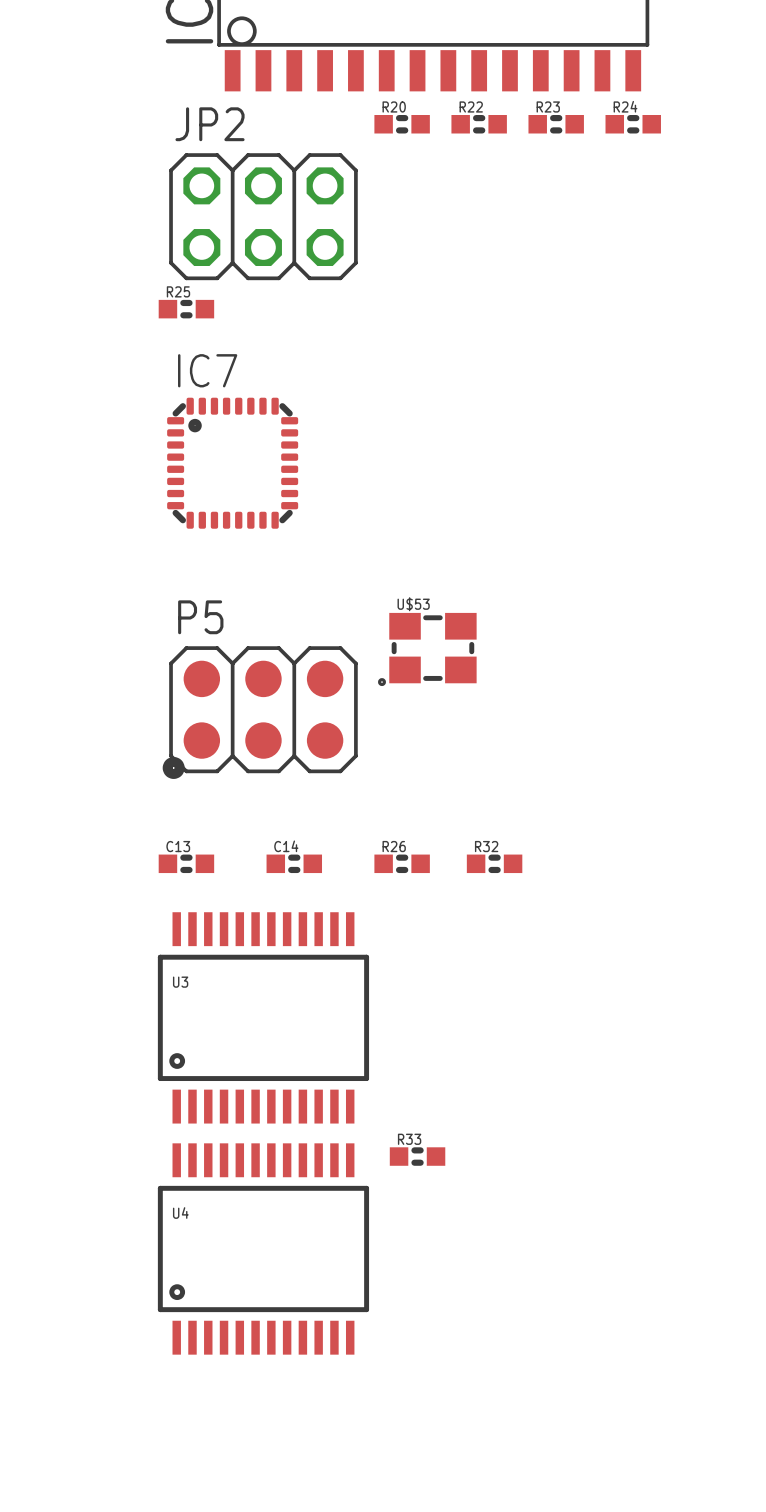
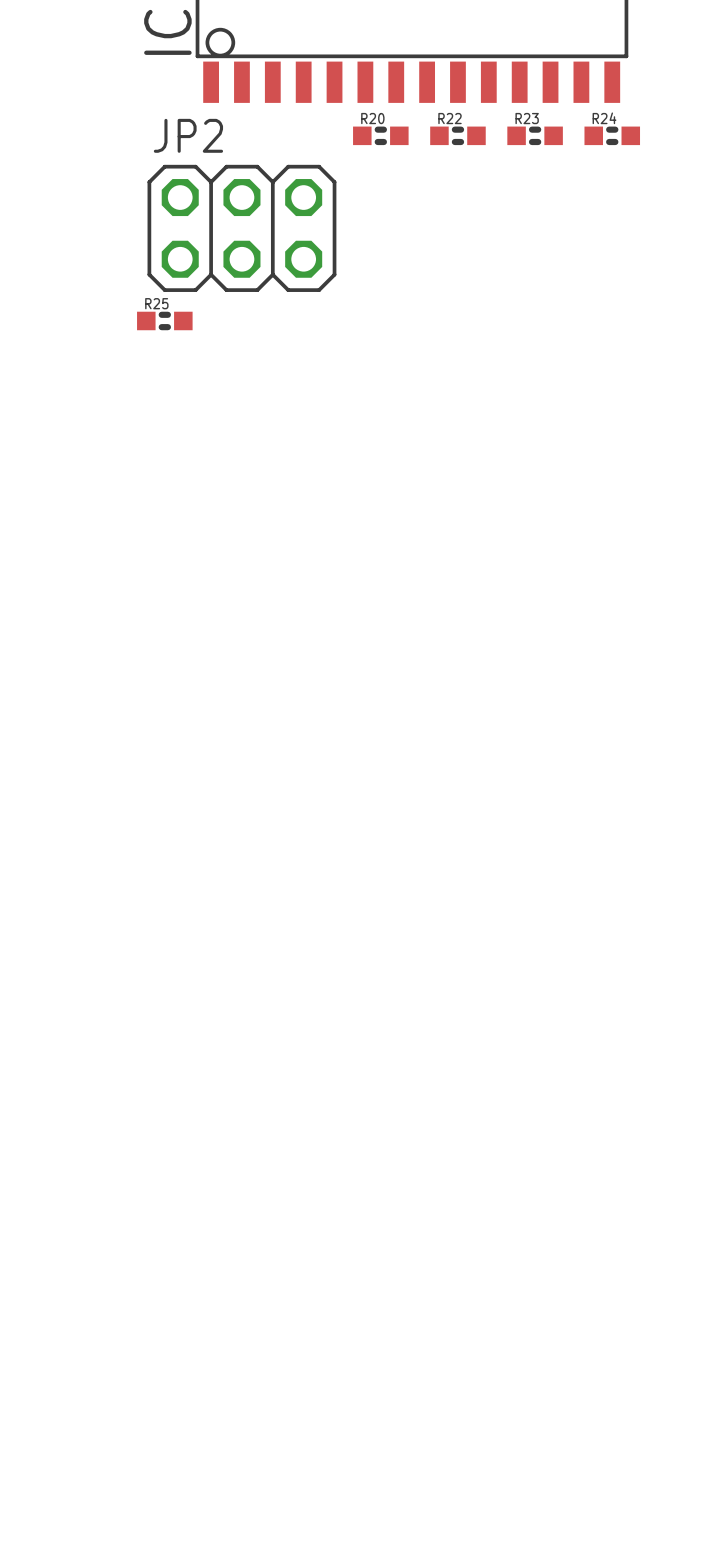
IC7: (232, 463) -> none
U$53: (427, 649) -> none
P5: (260, 712) -> none
C13: (186, 863) -> none
C14: (294, 863) -> none
R26: (402, 863) -> none
R32: (494, 863) -> none
U3: (263, 1017) -> none
R33: (417, 1156) -> none
U4: (263, 1248) -> none

